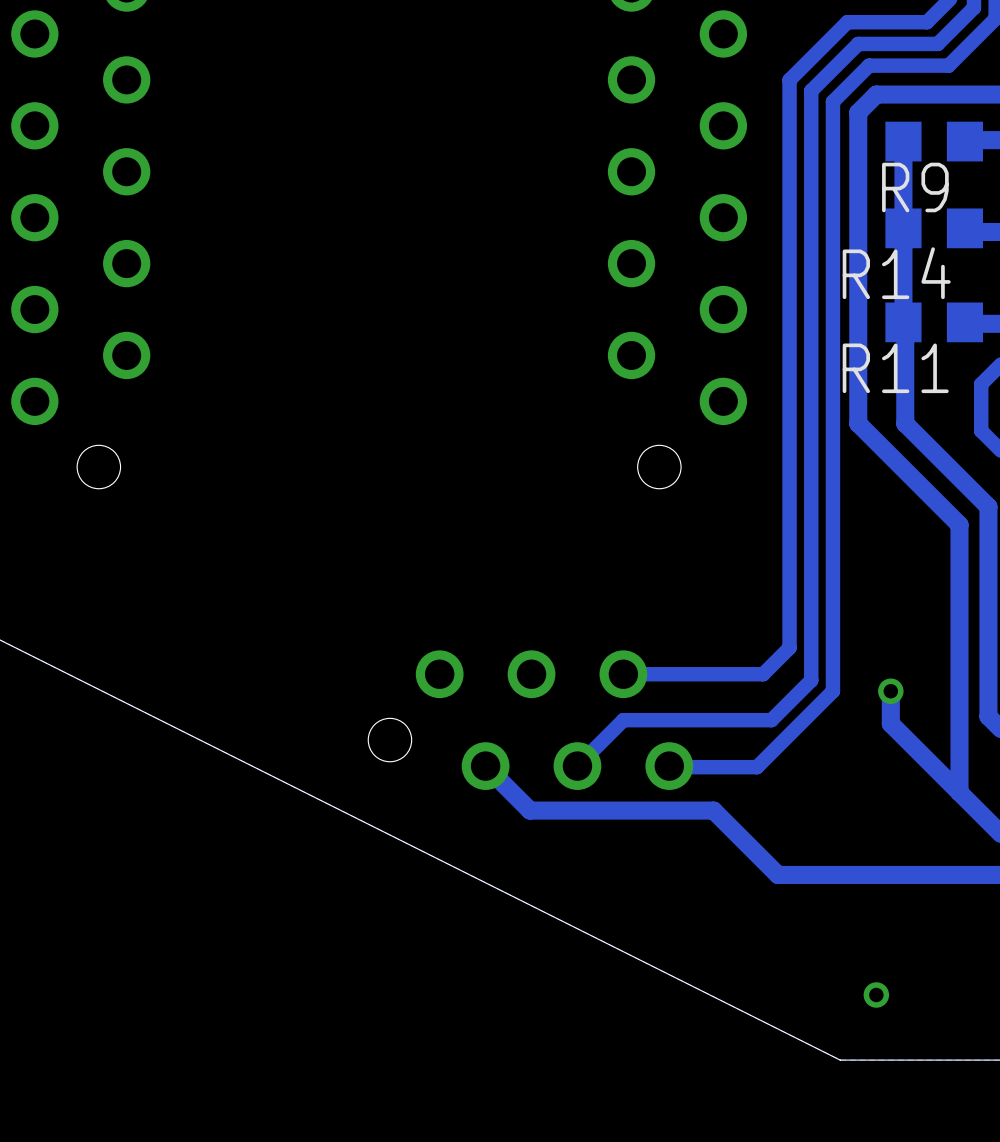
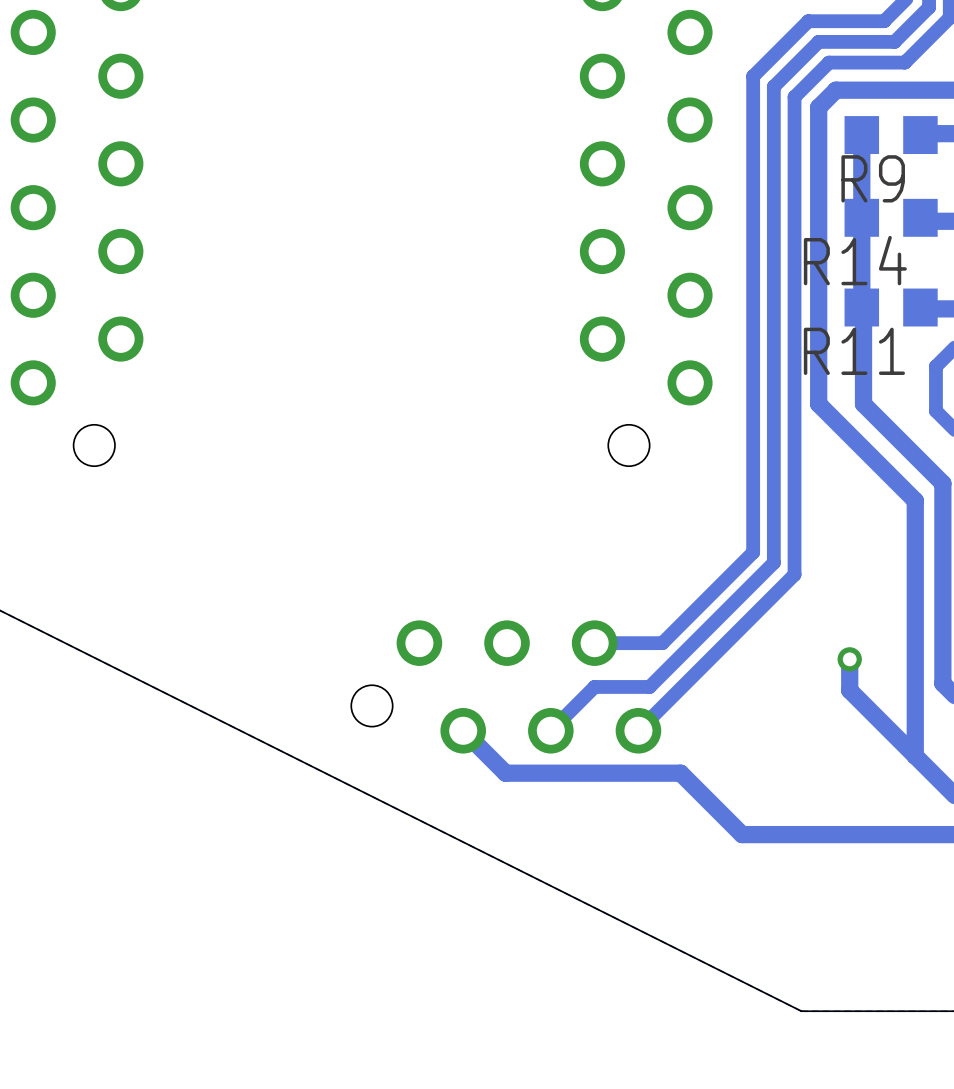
track: (789, 579) (789, 647) (763, 674) (694, 674) -> (753, 552) (662, 643)
track: (811, 589) (811, 680) (771, 720) (681, 720) -> (773, 562) (649, 686)
track: (832, 602) (832, 691) (757, 767) (669, 766) -> (794, 574) (638, 730)
via: (876, 995) -> none

